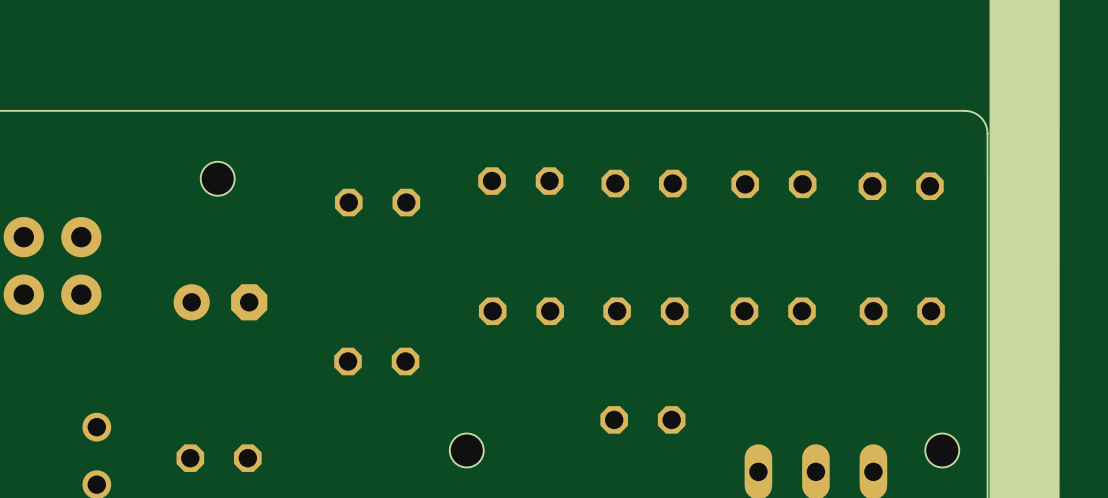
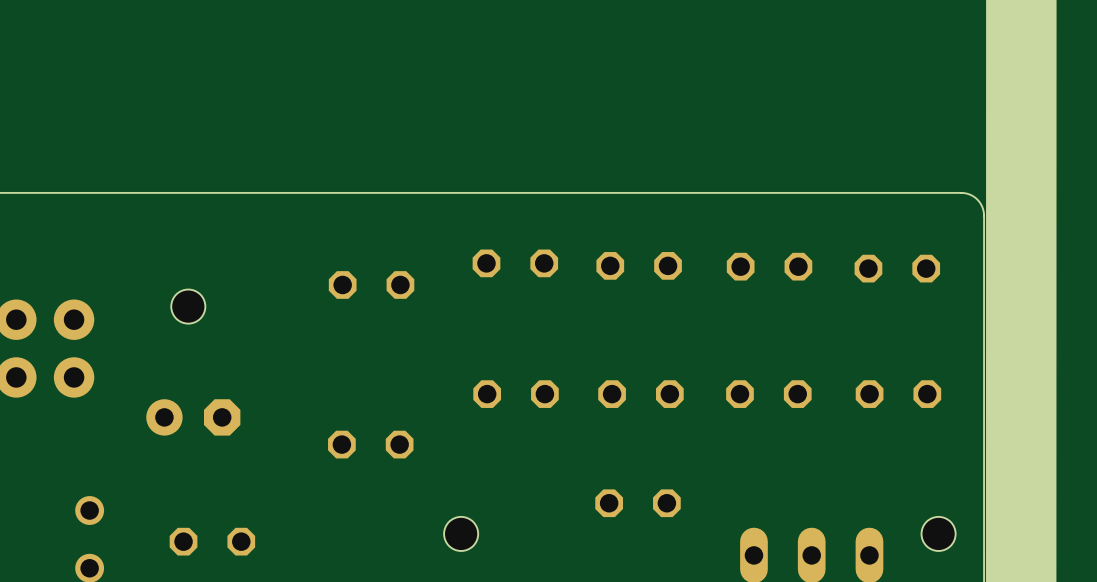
hole position: (217, 178) -> (188, 306)
part position: (220, 302) -> (193, 417)

